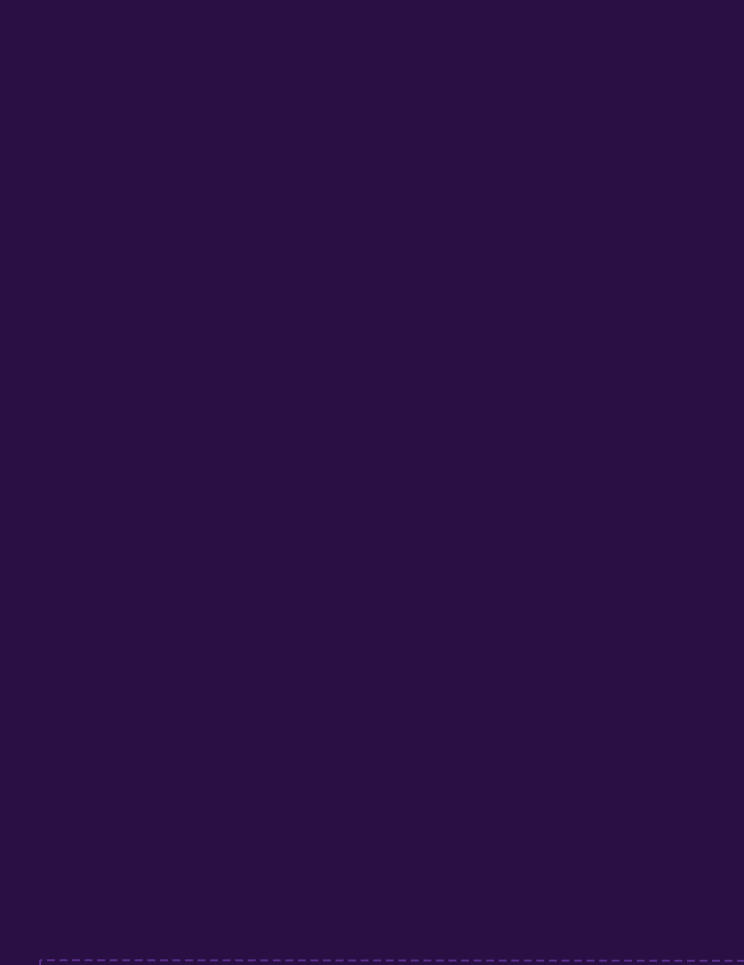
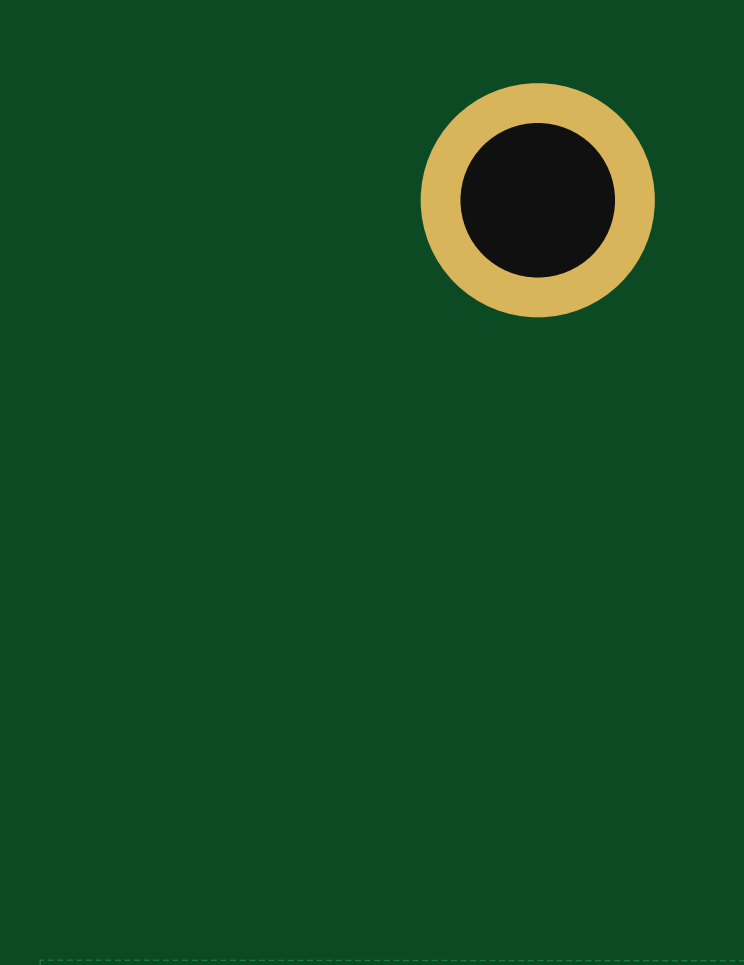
part: none -> (537, 200)

